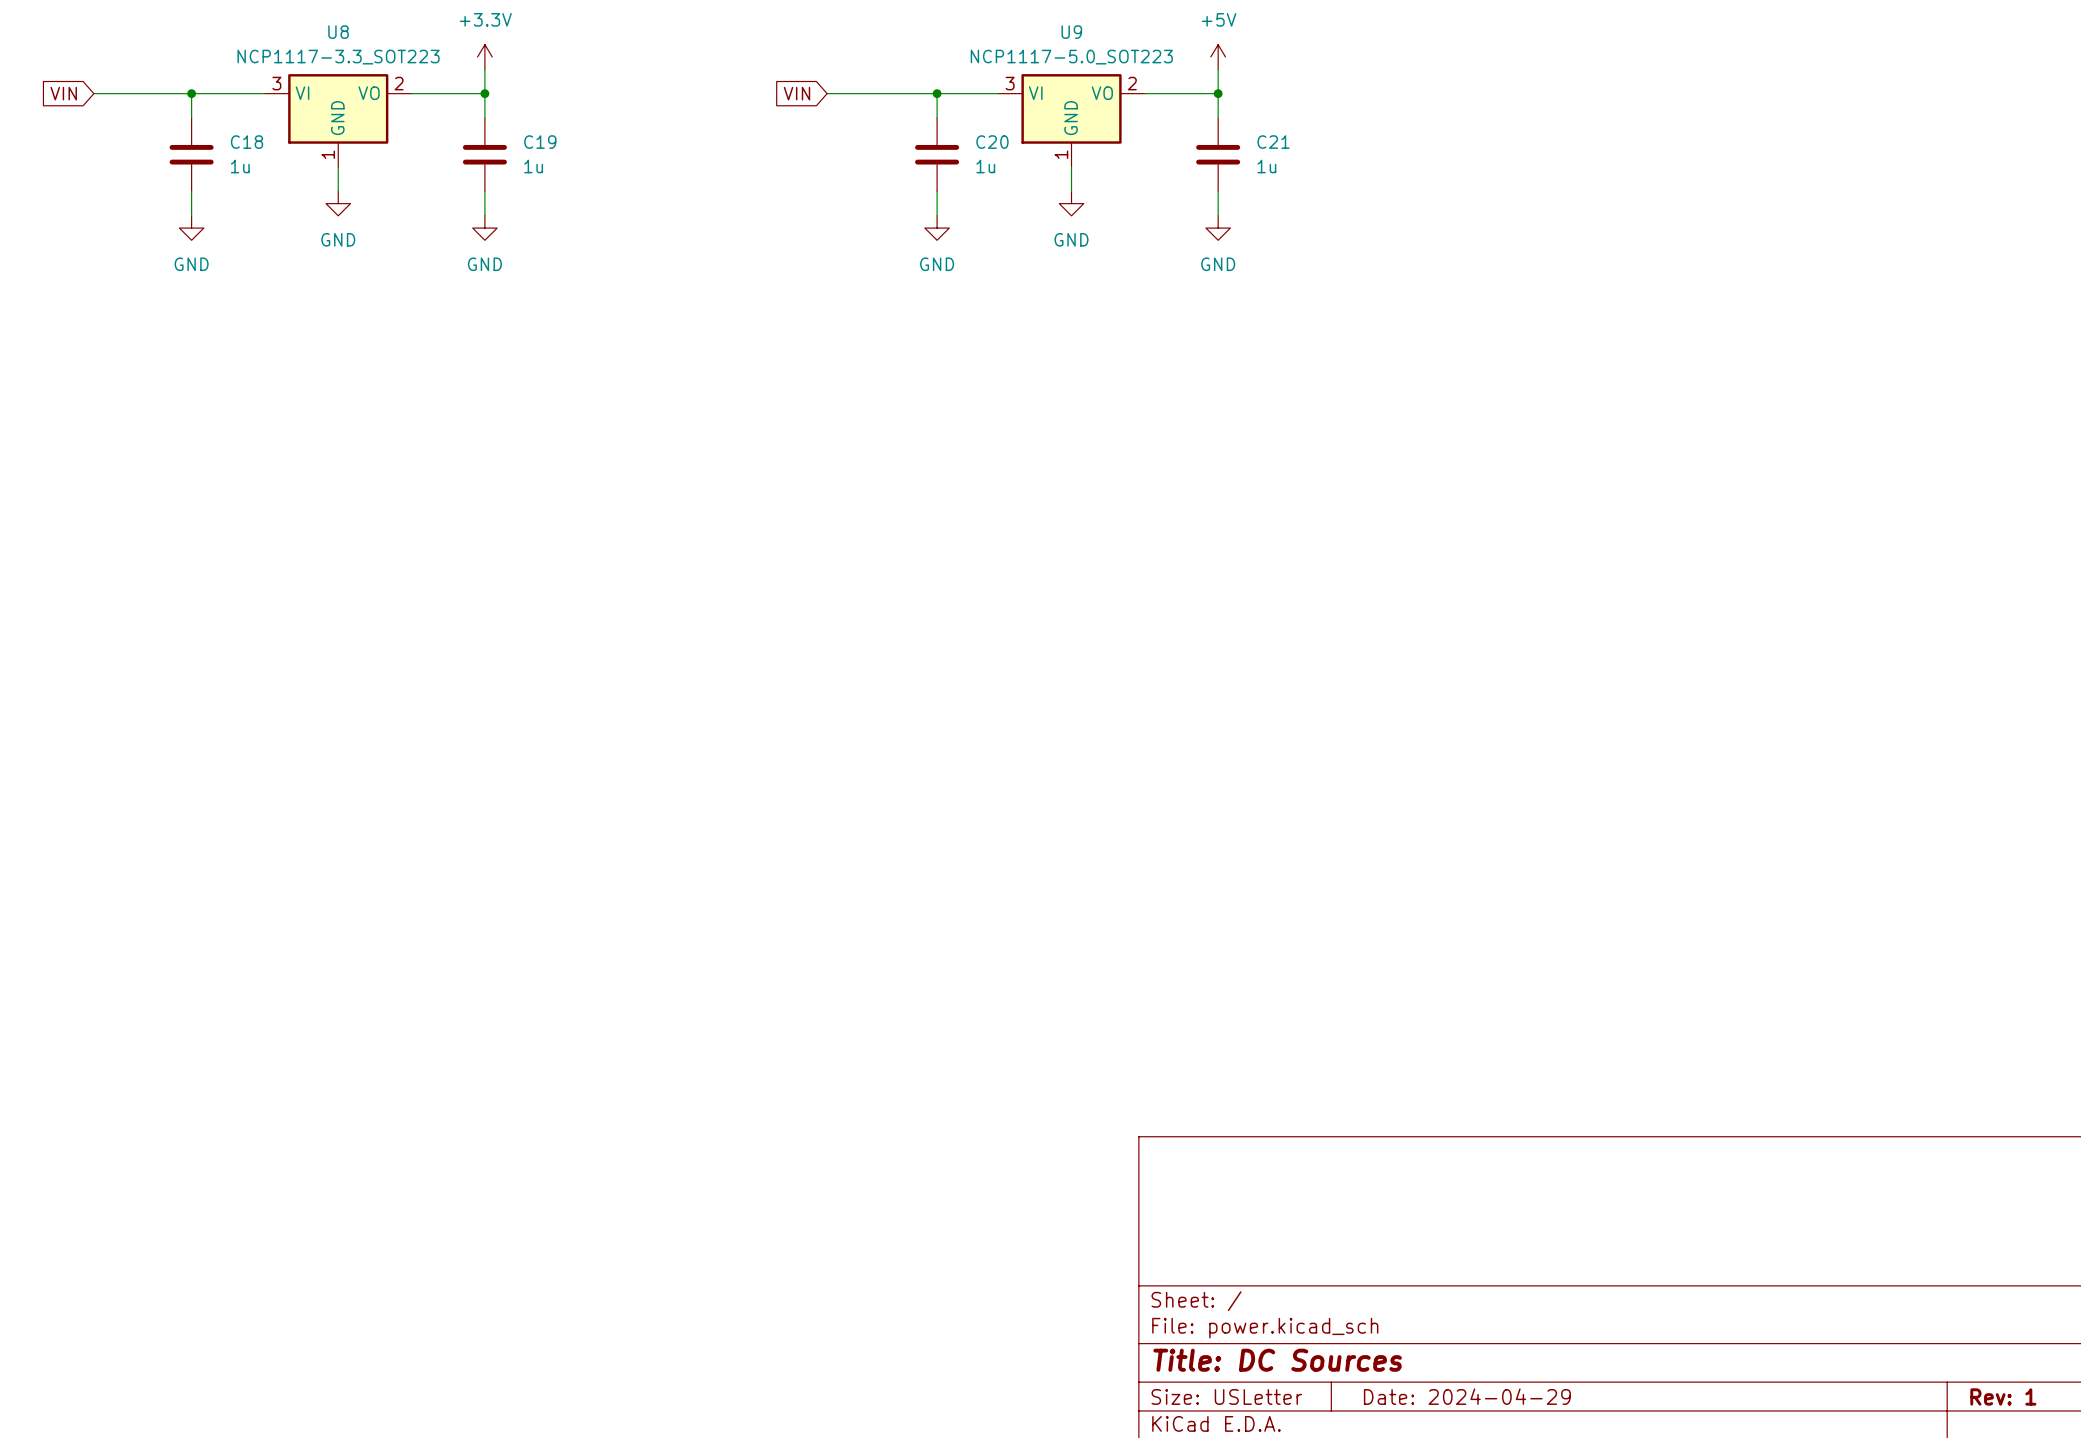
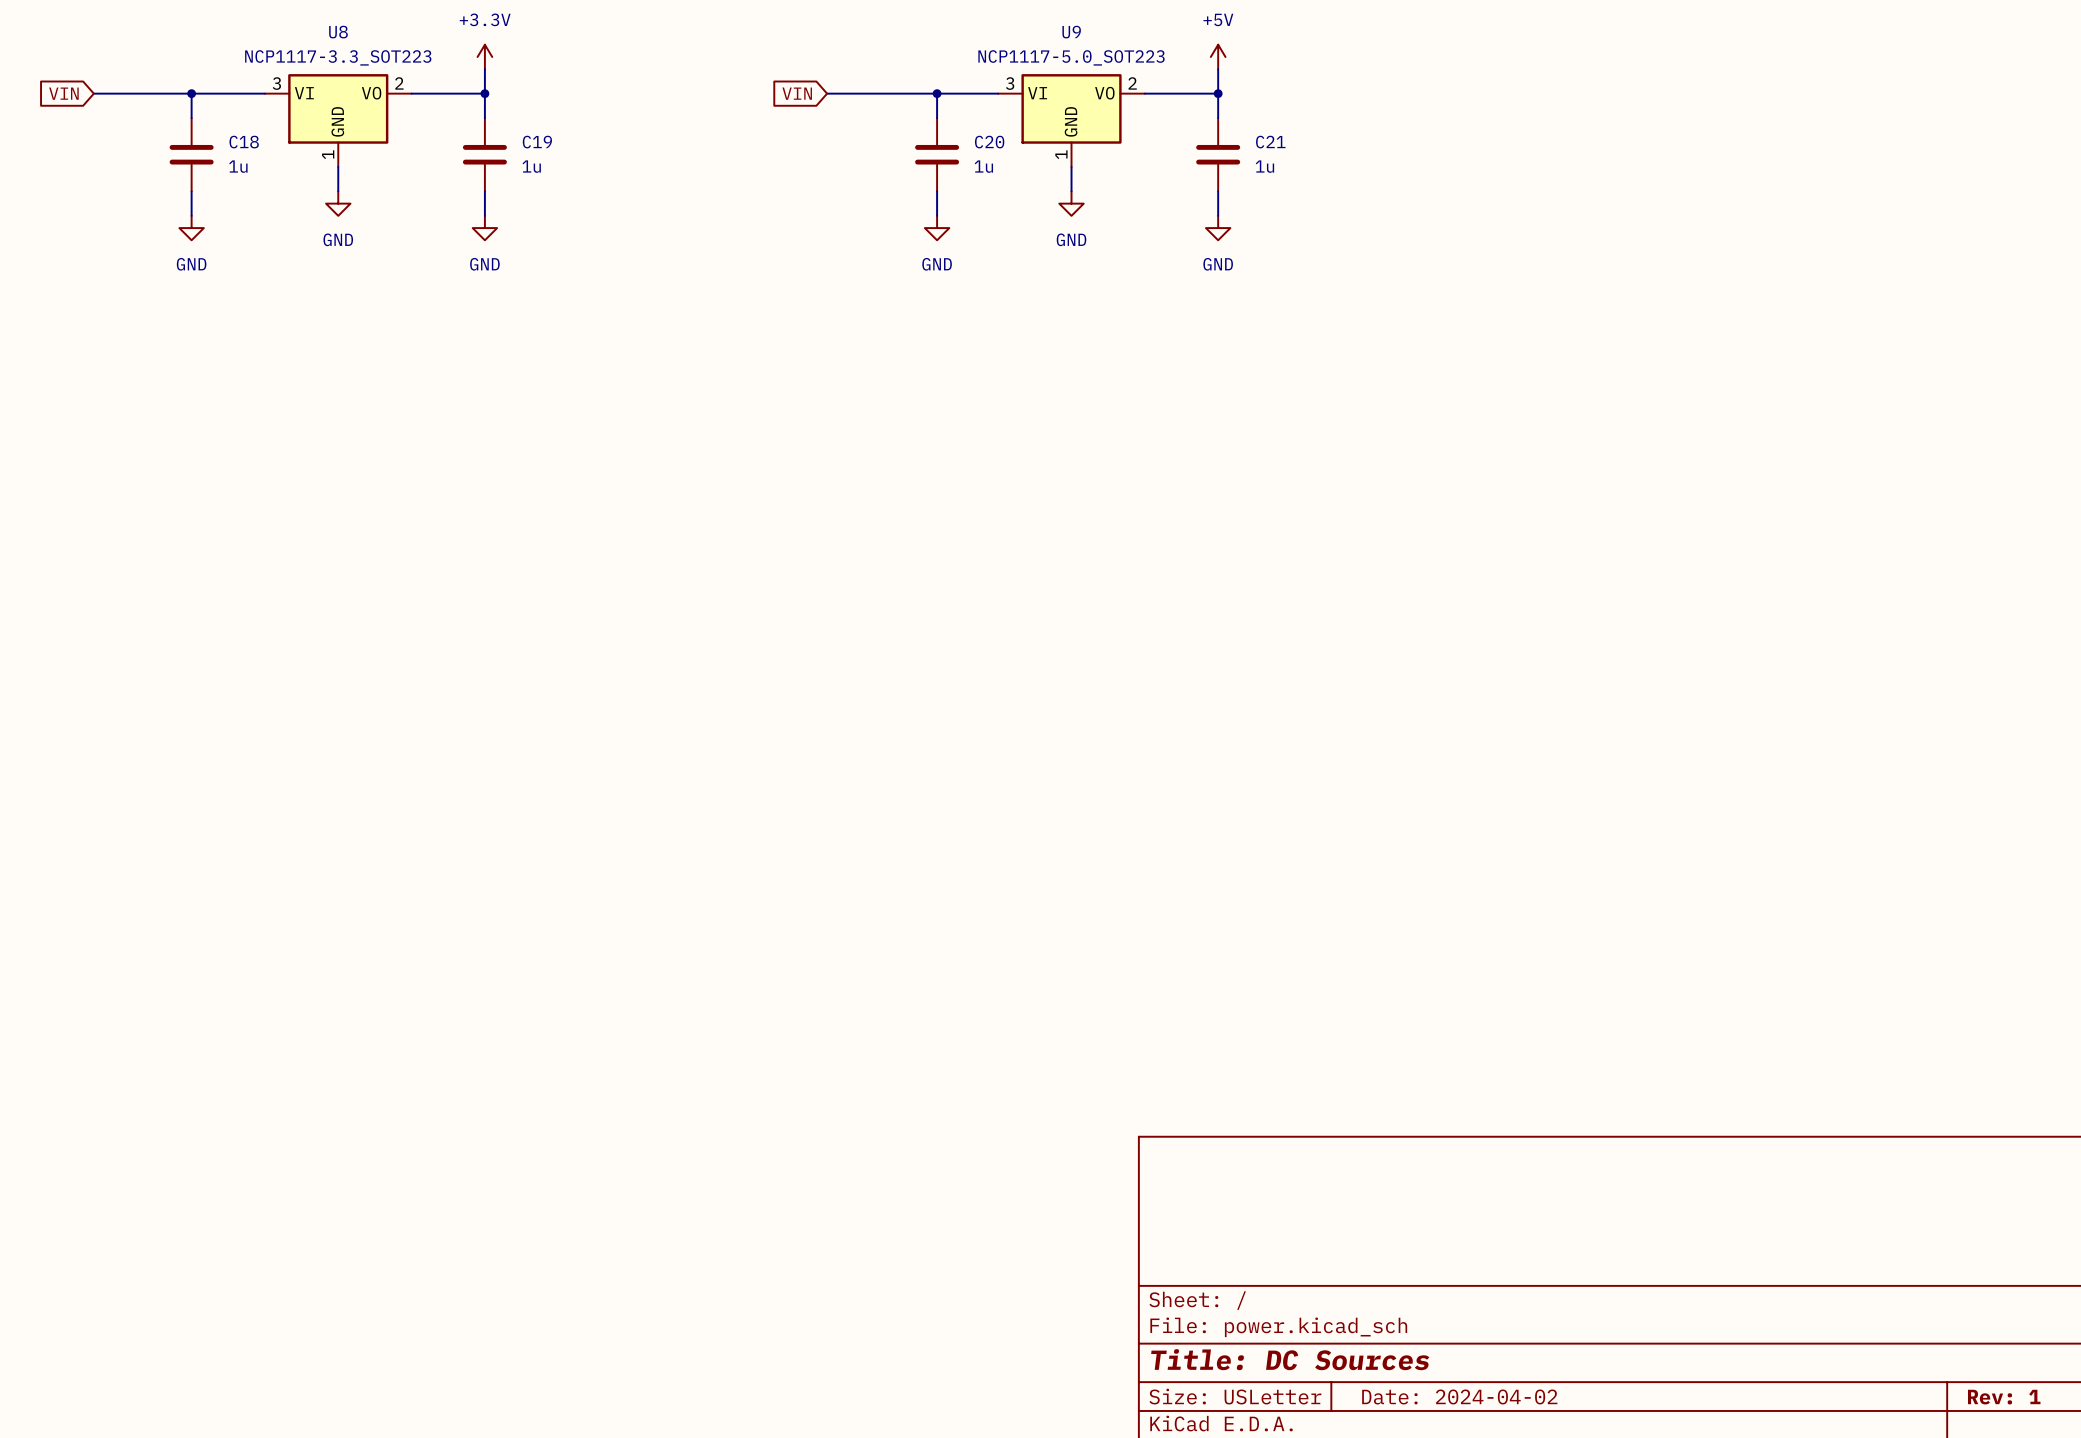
title block: Date: 2024-04-29 (1467, 1396) -> Date: 2024-04-02 (1459, 1396)

